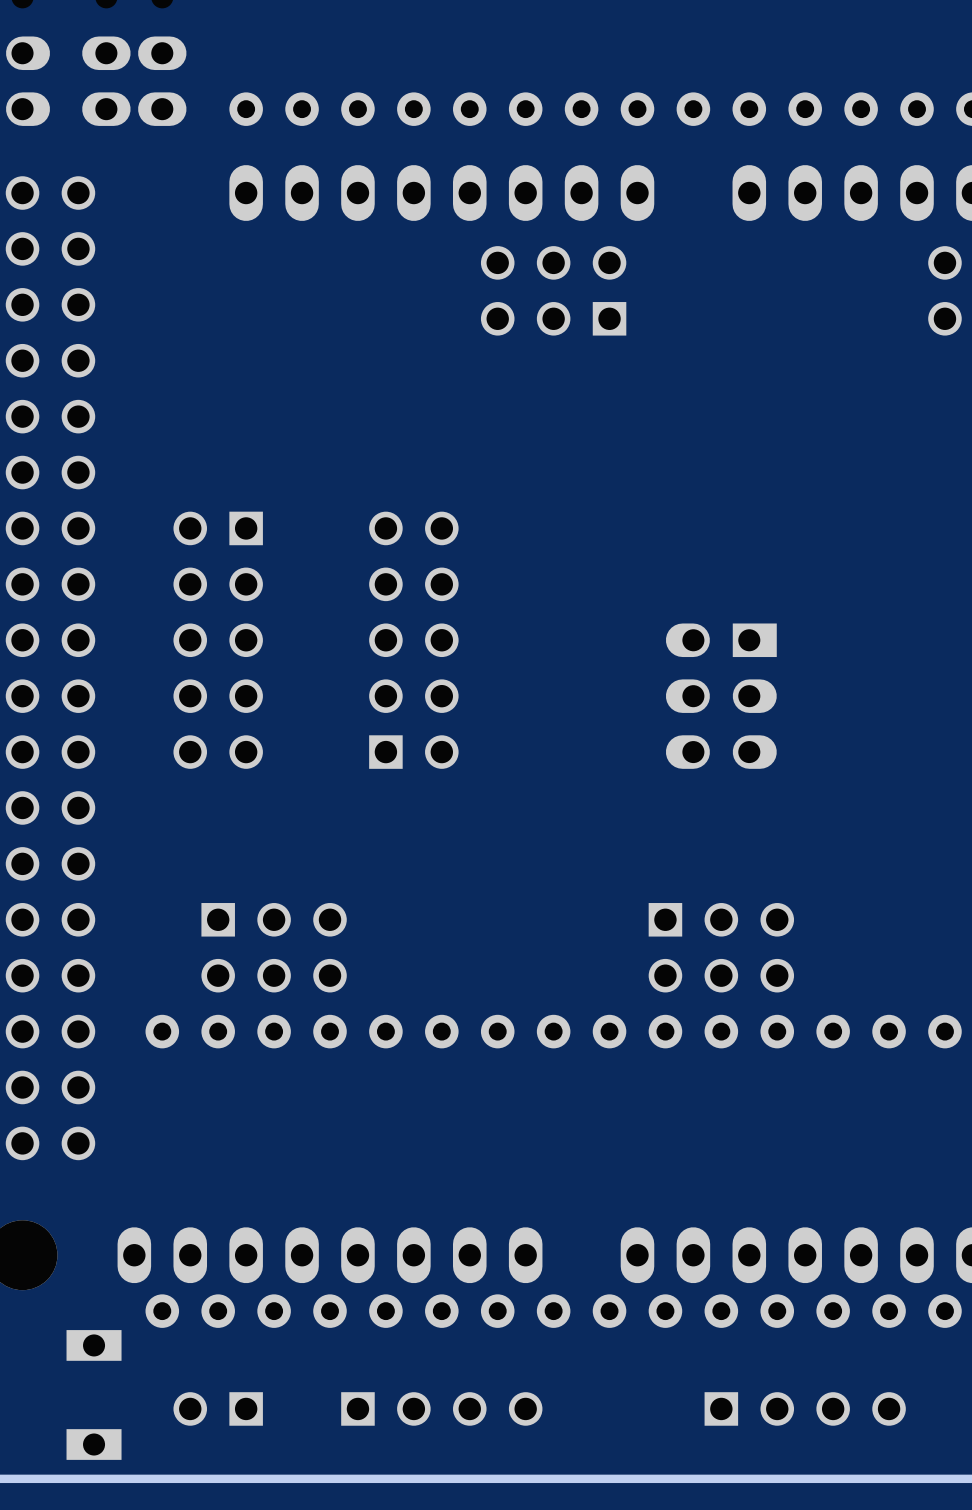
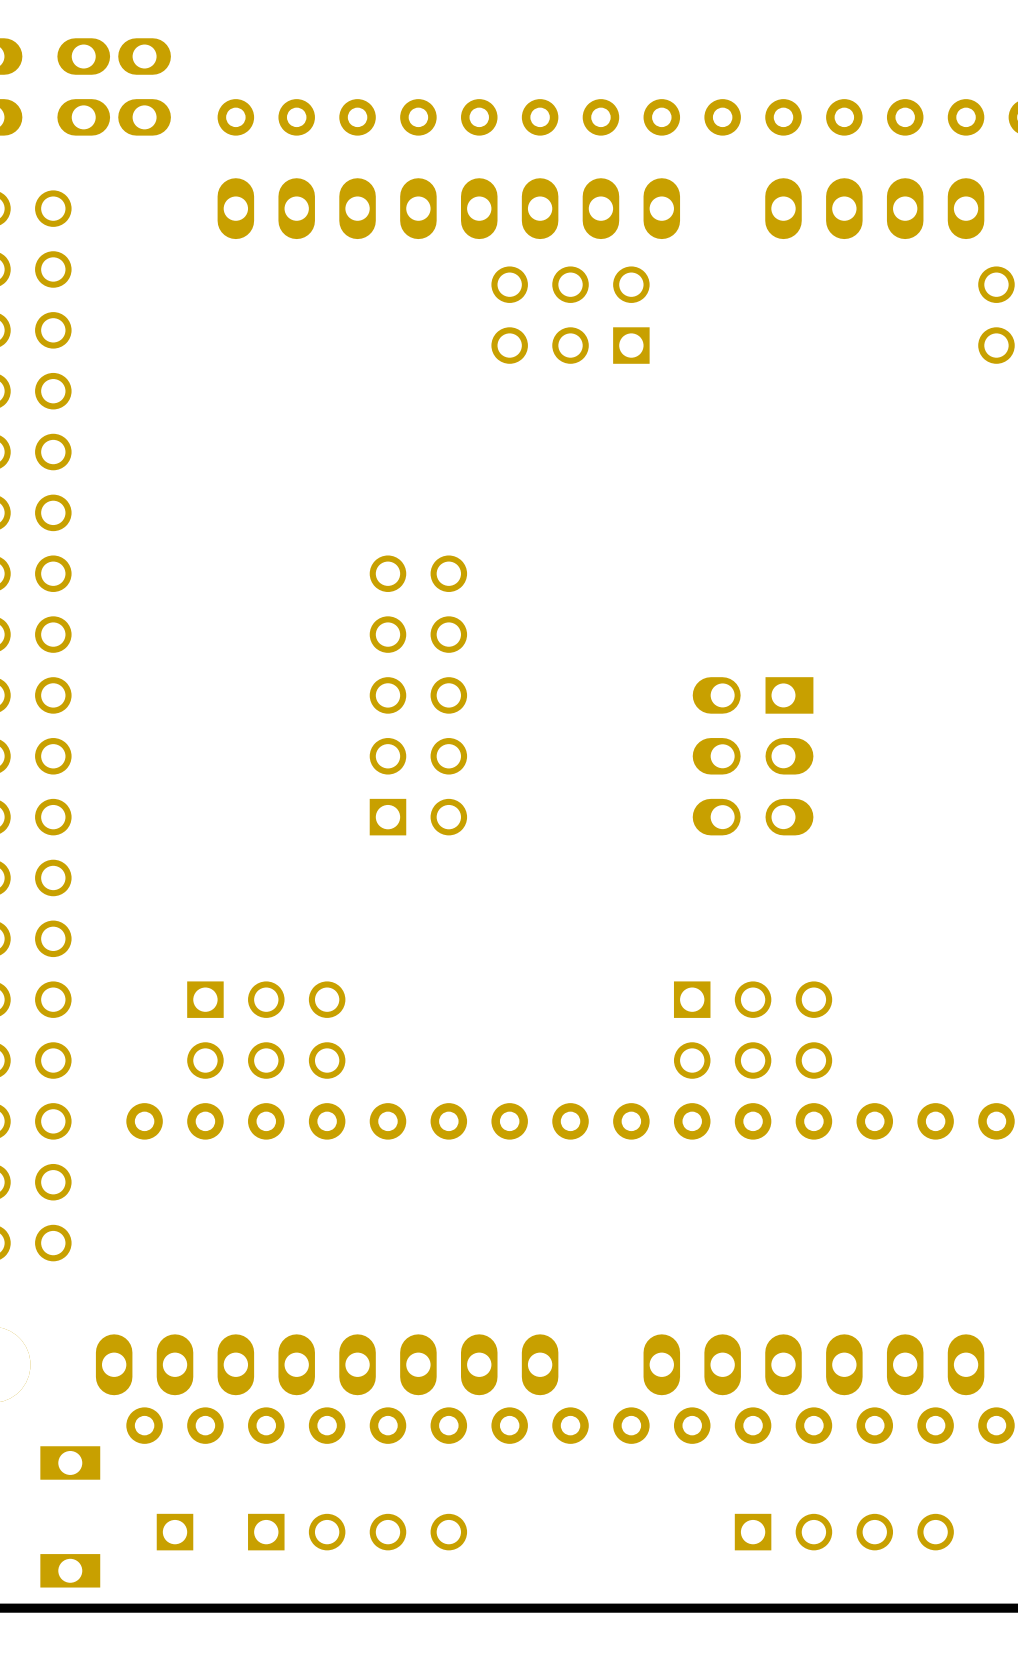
part: (218, 640) -> none
part: none -> (175, 1532)
part: (218, 1408) -> none
part position: (441, 1408) -> (357, 1532)

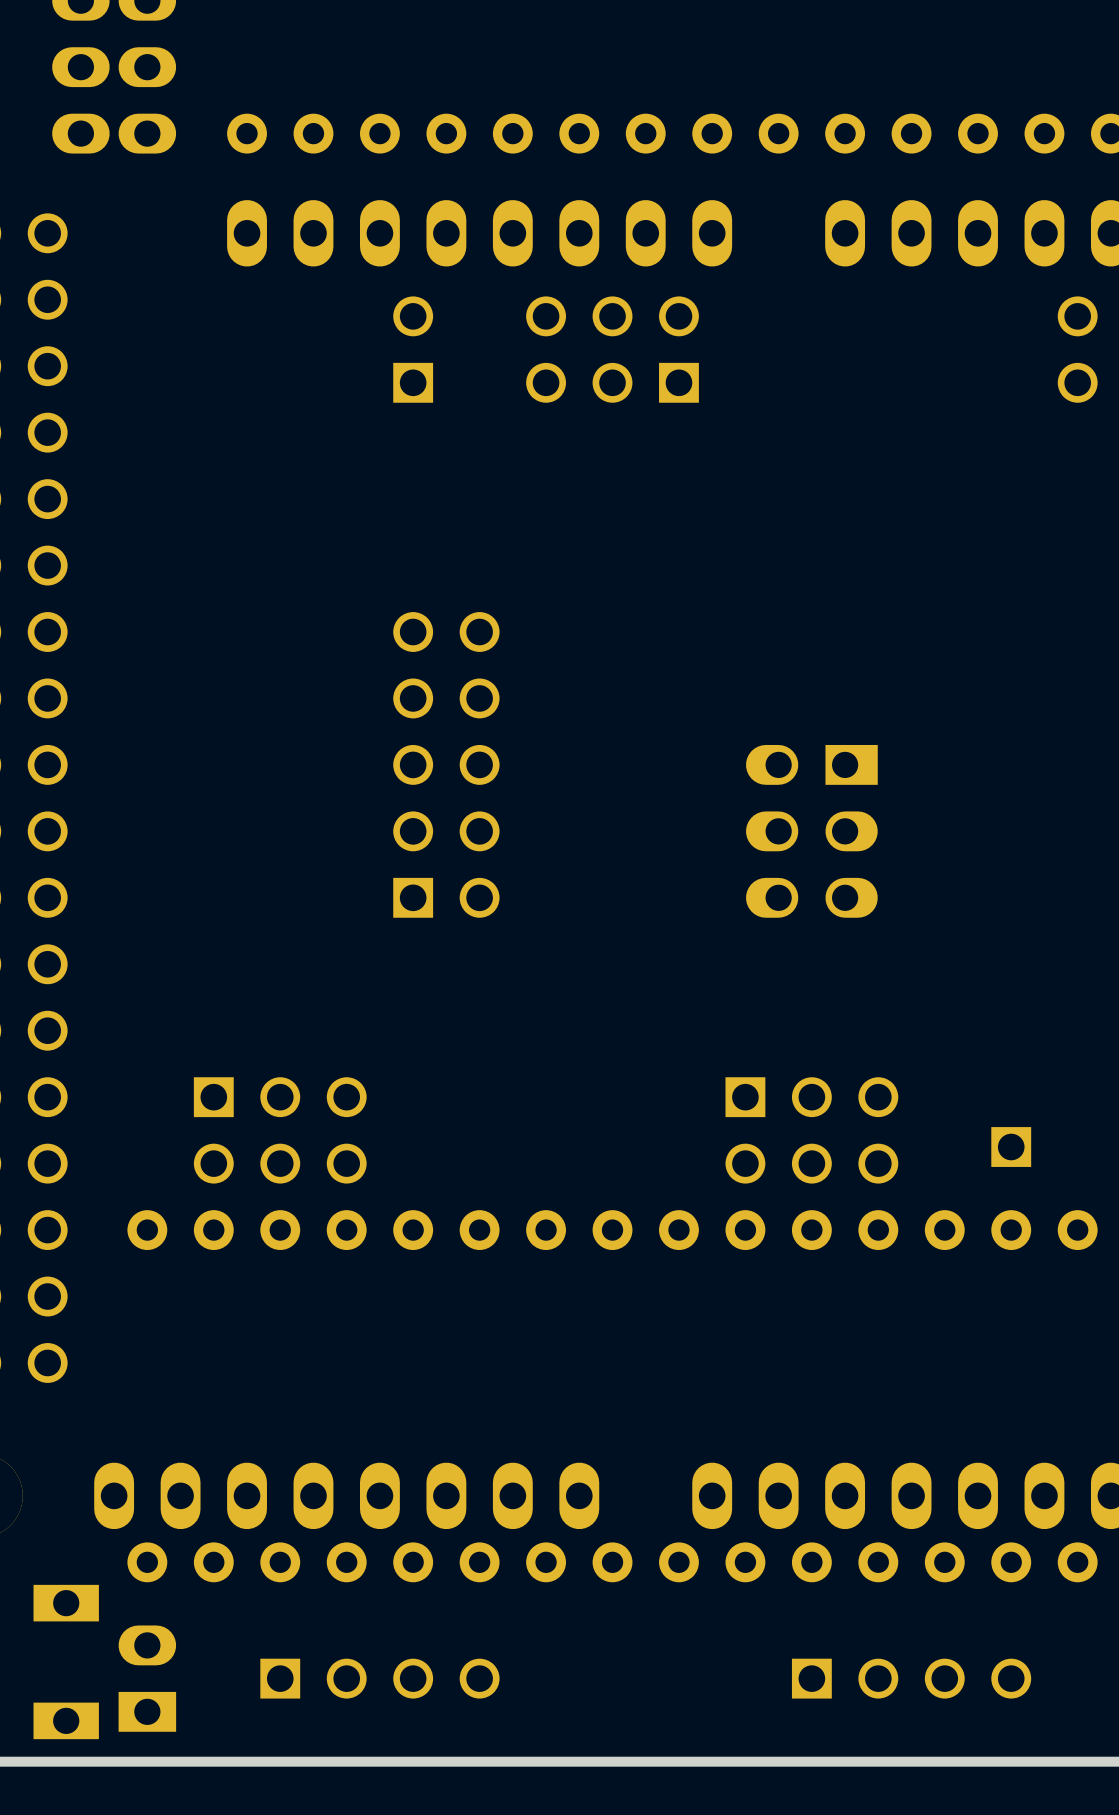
part: none -> (413, 349)
part: none -> (1011, 1147)
part: none -> (147, 1678)
part: (175, 1532) -> none

